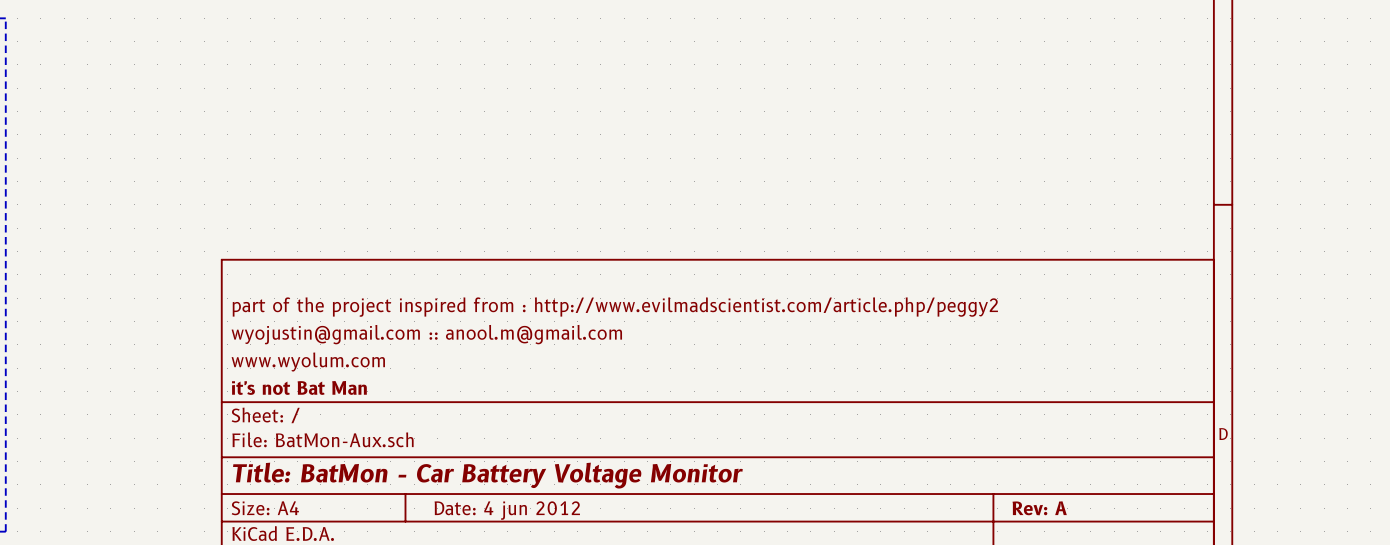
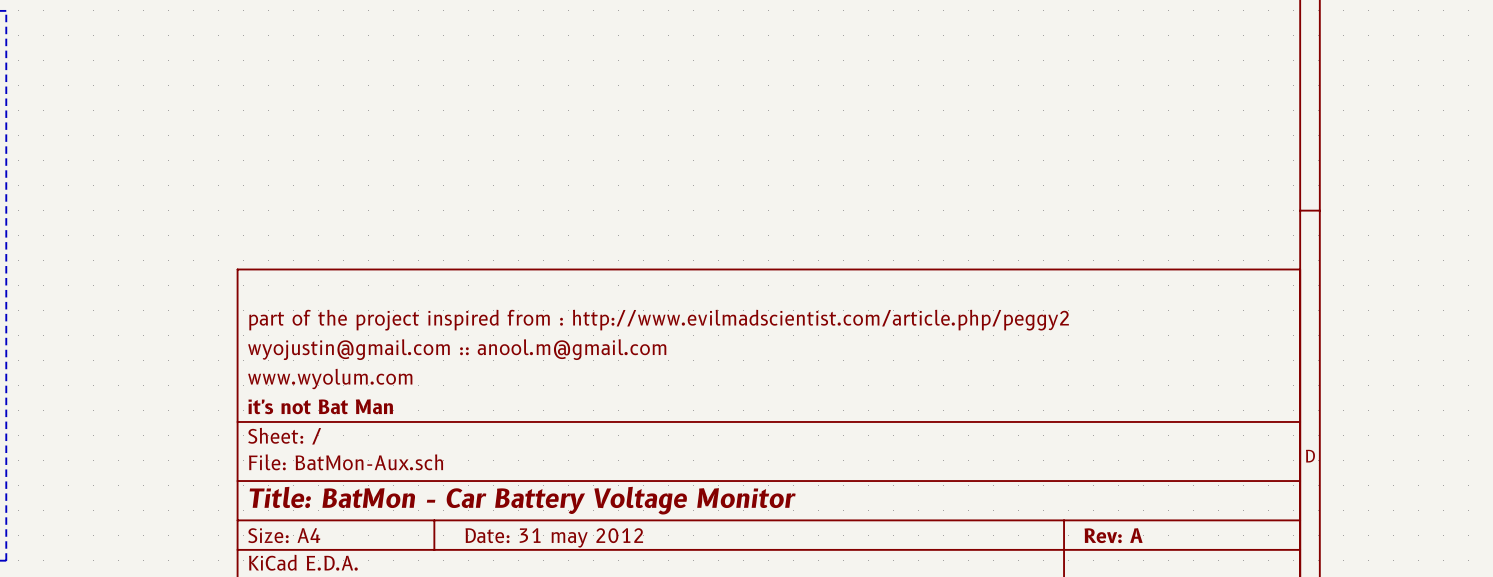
title block: Date: 4 jun 2012 (507, 510) -> Date: 31 may 2012 (554, 537)

